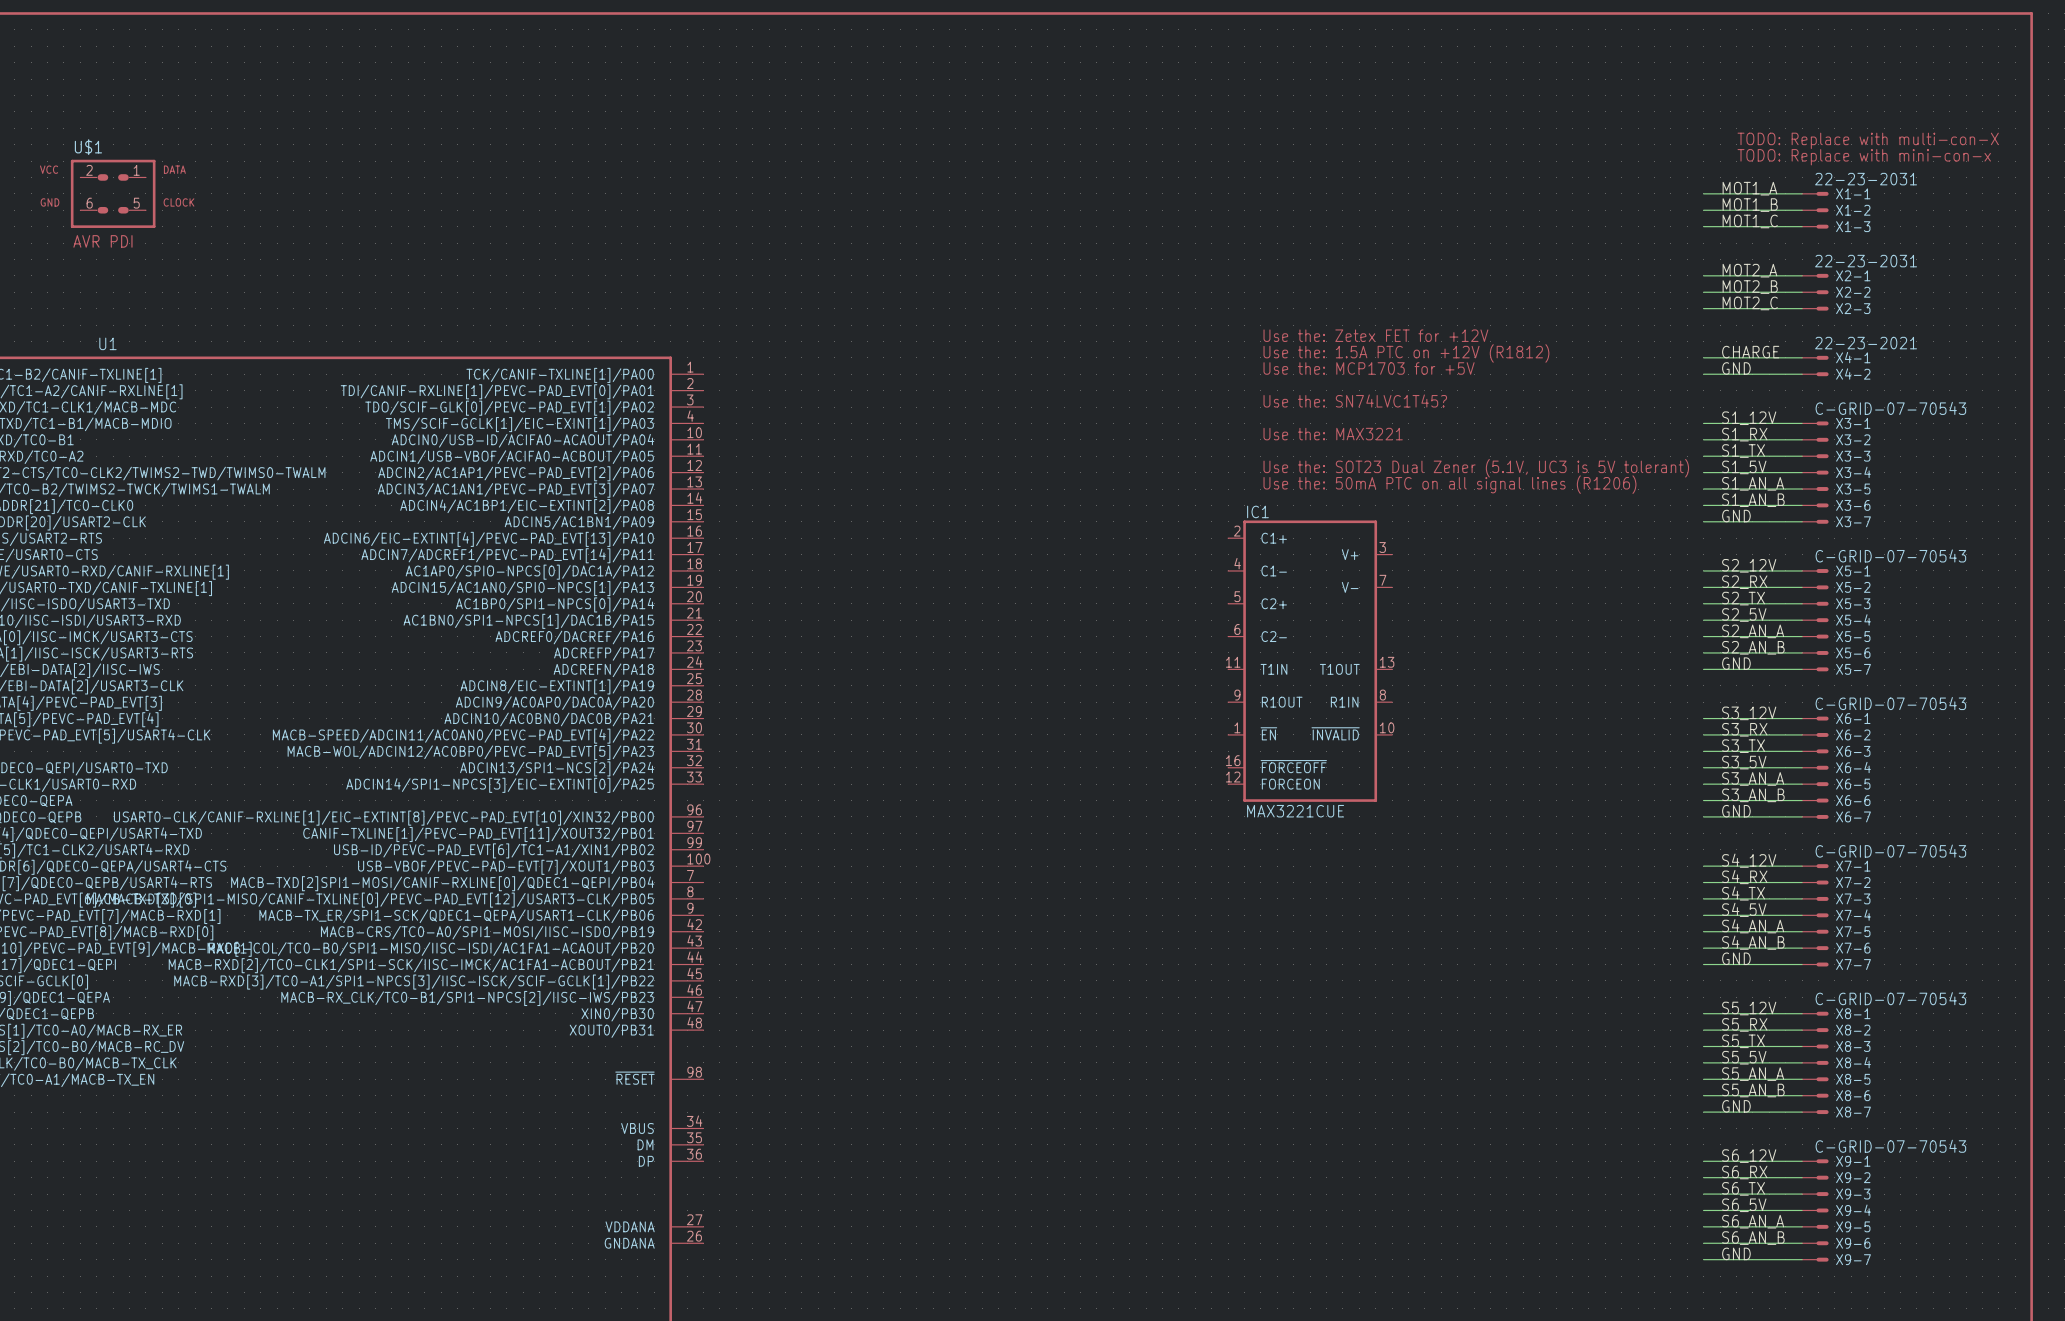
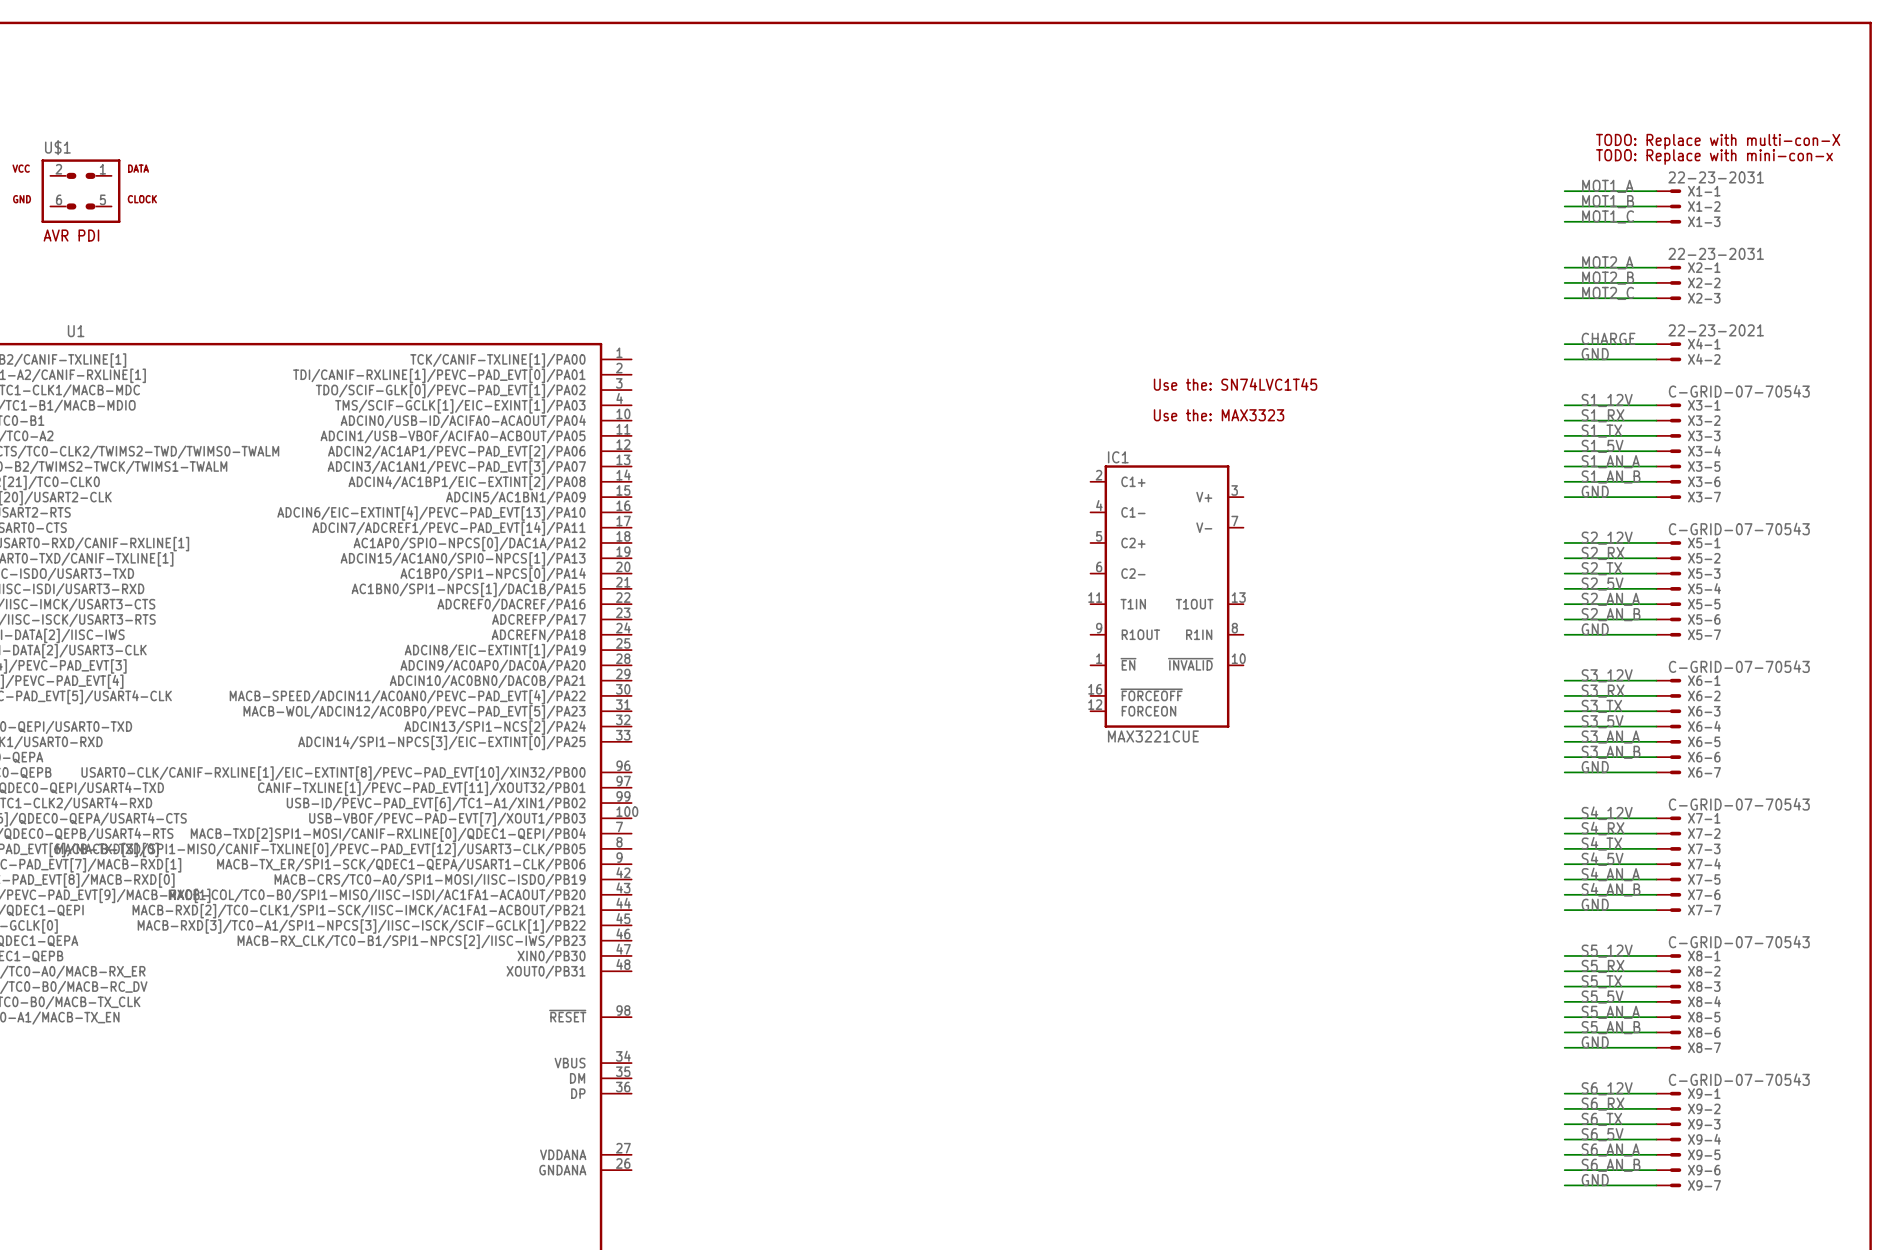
text: Use the: Zetex FET for +12V (1375, 335) -> none
text: Use the: 1.5A PTC on +12V (R1812) (1406, 353) -> none
text: Use the: MCP1703 for +5V (1369, 368) -> none
text: Use the: SN74LVC1T45? (1355, 401) -> Use the: SN74LVC1T45 (1235, 384)
text: Use the: MAX3221 (1333, 434) -> Use the: MAX3323 (1219, 415)
text: Use the: SOT23 Dual Zener (5.1V, UC3 is 5V tolerant) (1476, 468) -> none
text: Use the: 50mA PTC on all signal lines (R1206) (1449, 484) -> none
IC1 position: (1310, 661) -> (1166, 596)

